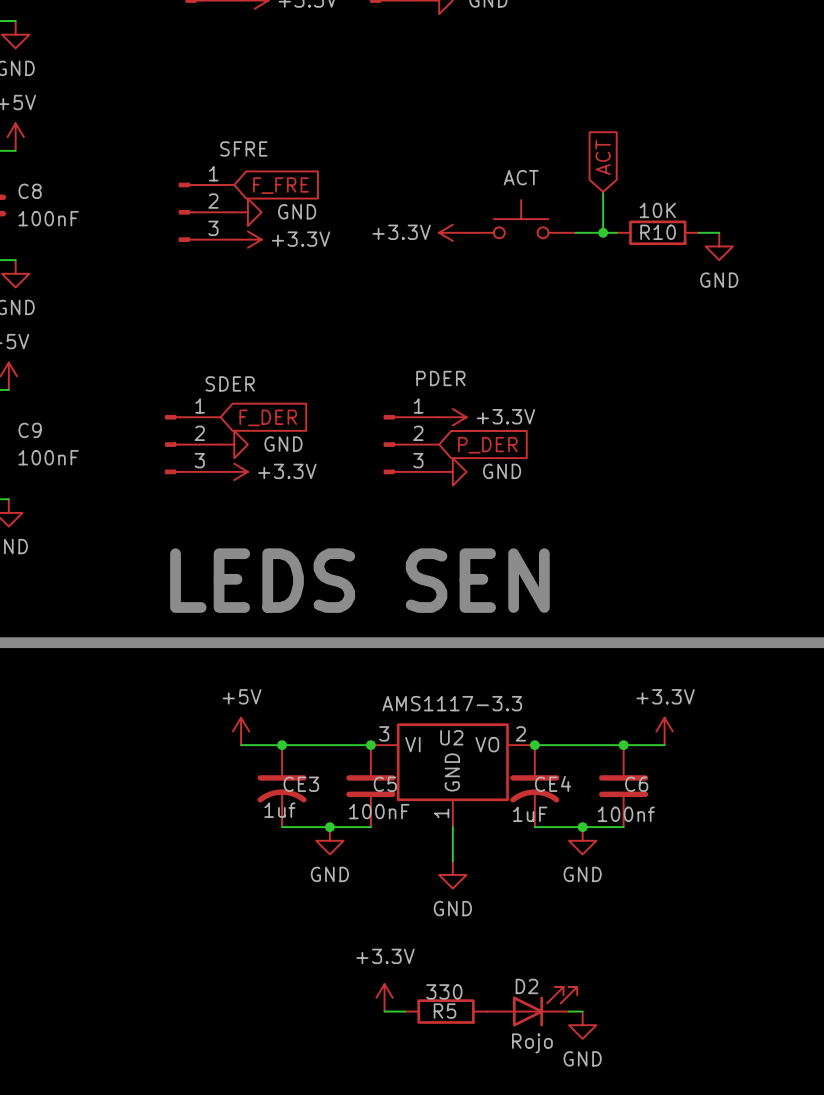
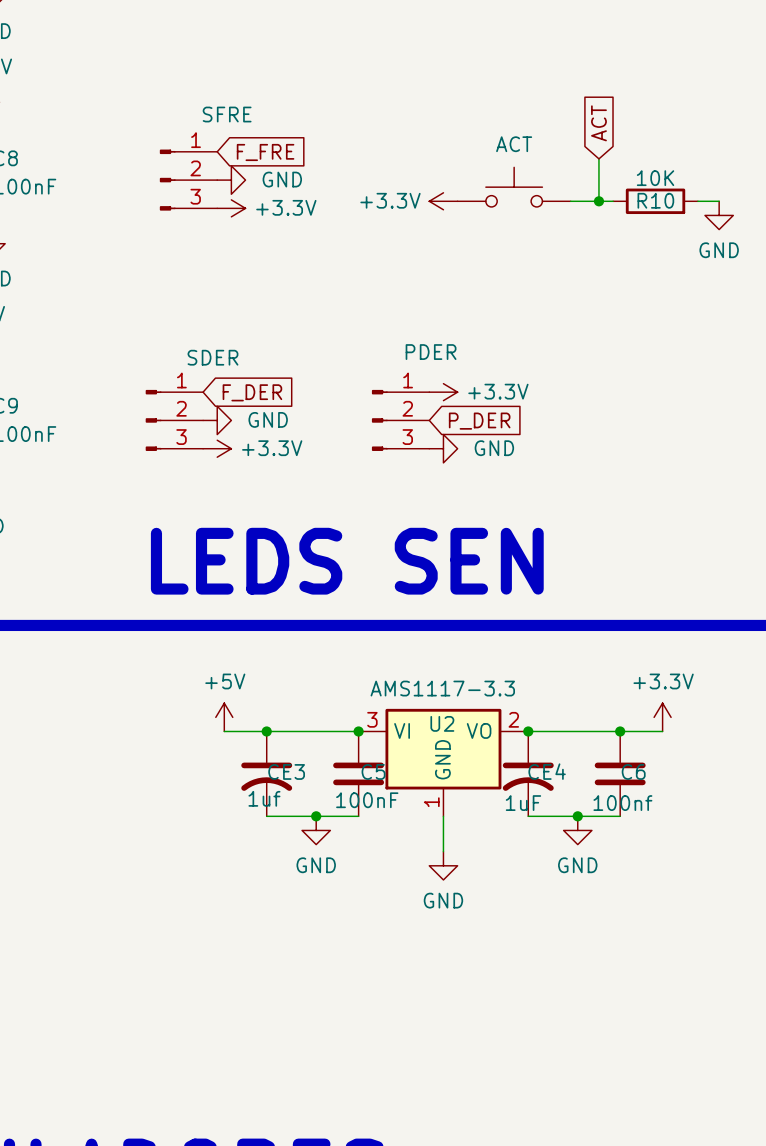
power symbol: +3.3V (384, 997) -> none
D2: Rojo (532, 1006) -> none
wire: (384, 1011) (405, 1011) -> none
R5: 330 (446, 1011) -> none
wire: (568, 1011) (582, 1011) -> none
power symbol: GND (582, 1025) -> none

